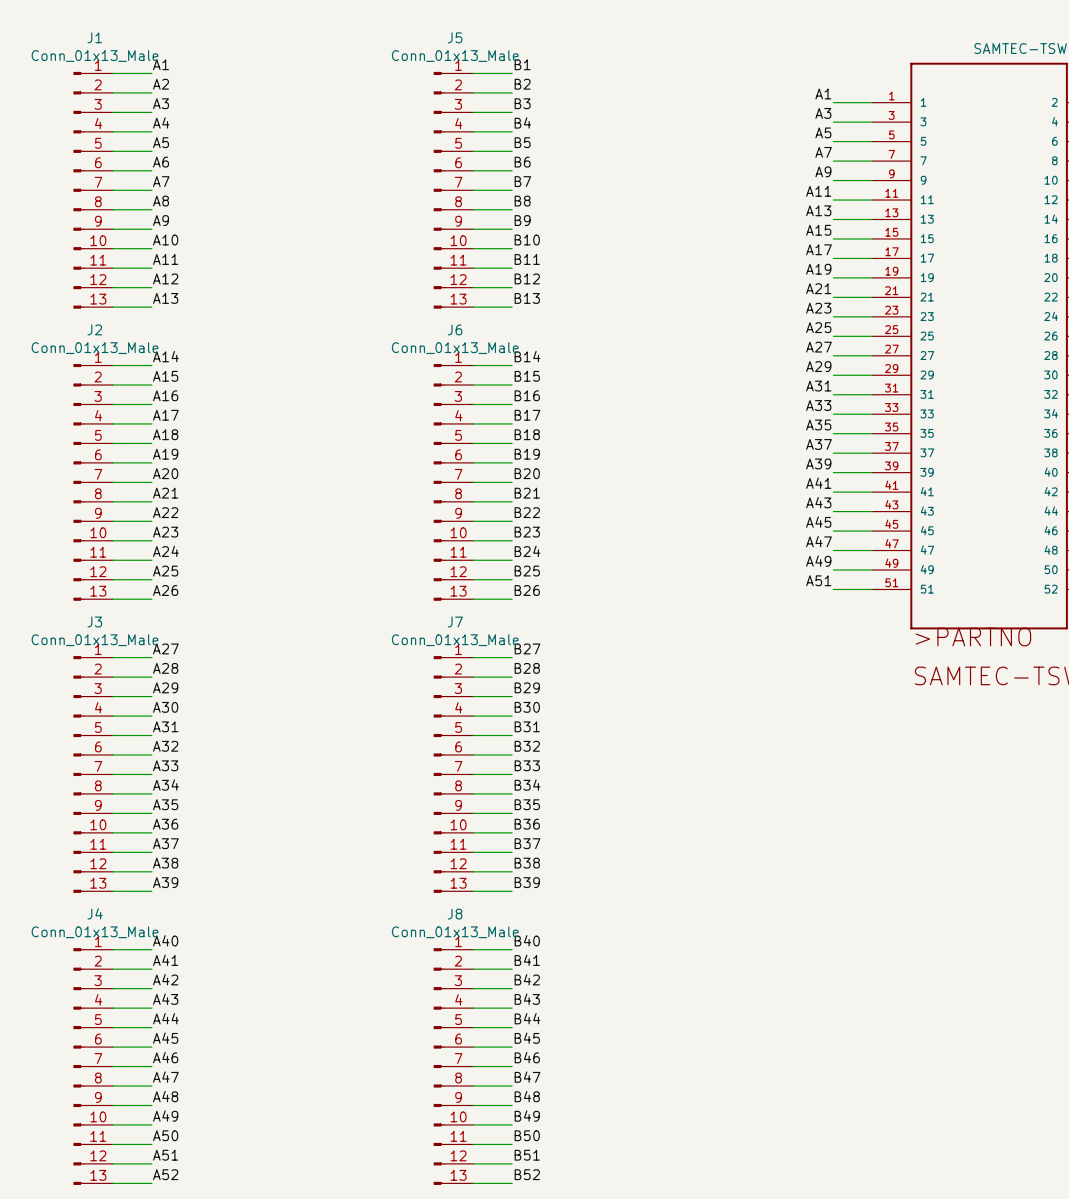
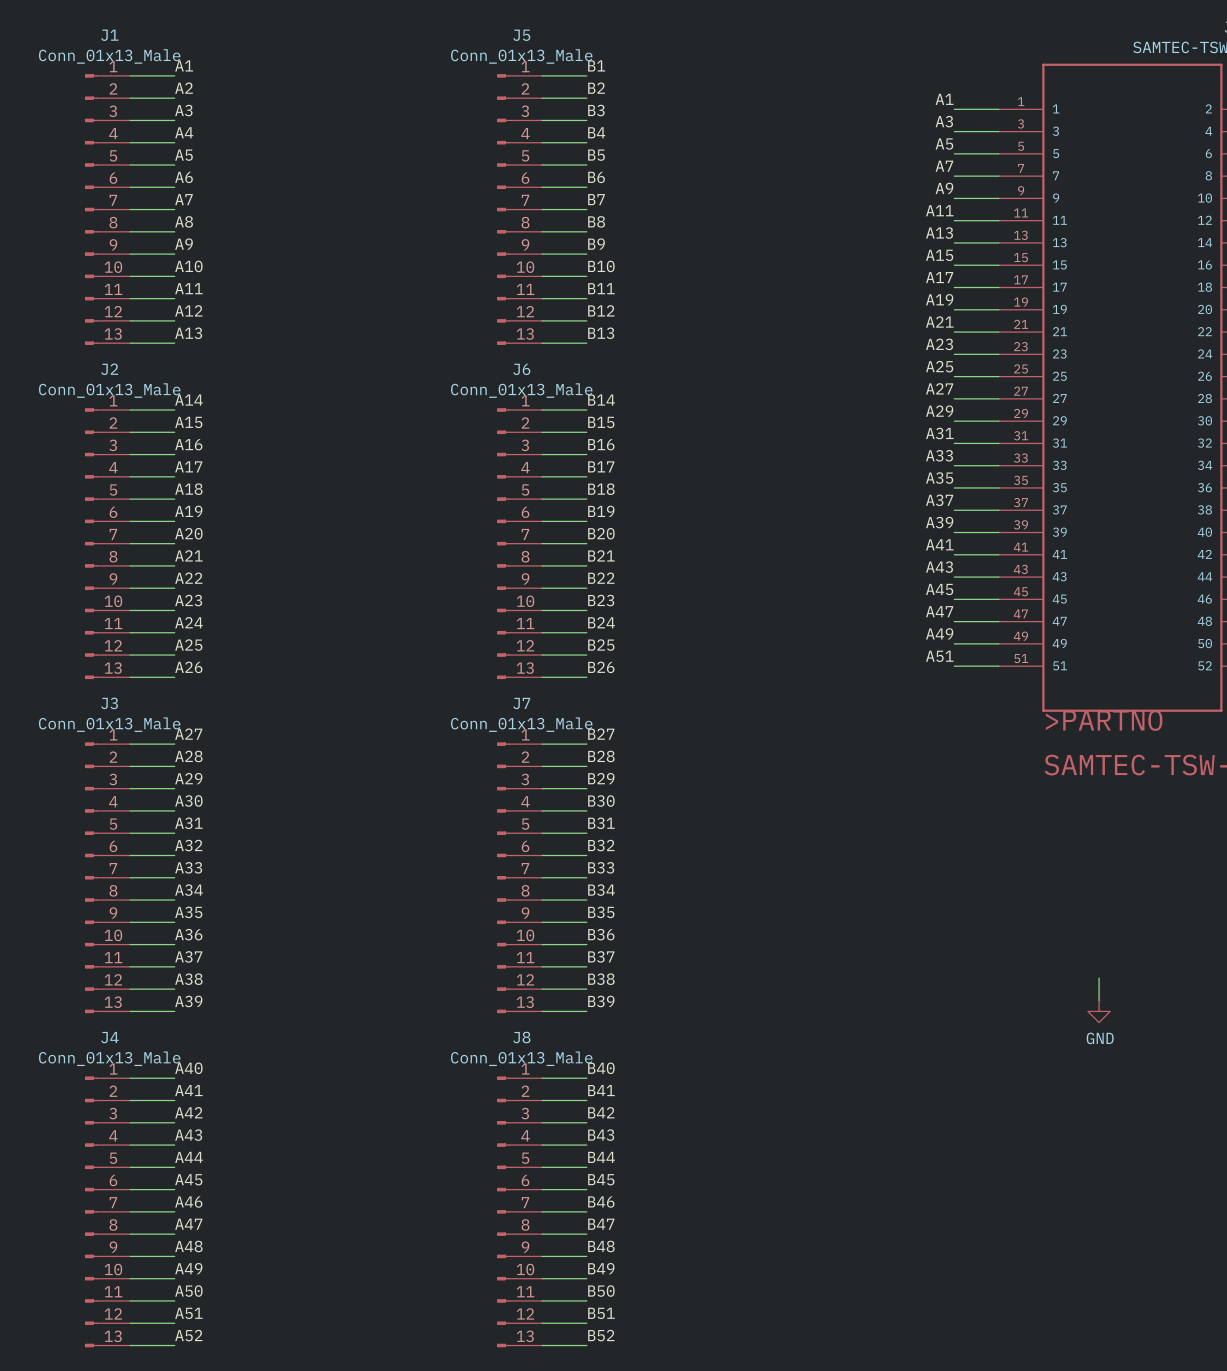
wire: none -> (1099, 978) (1099, 1000)
power symbol: none -> GND (1099, 1011)

